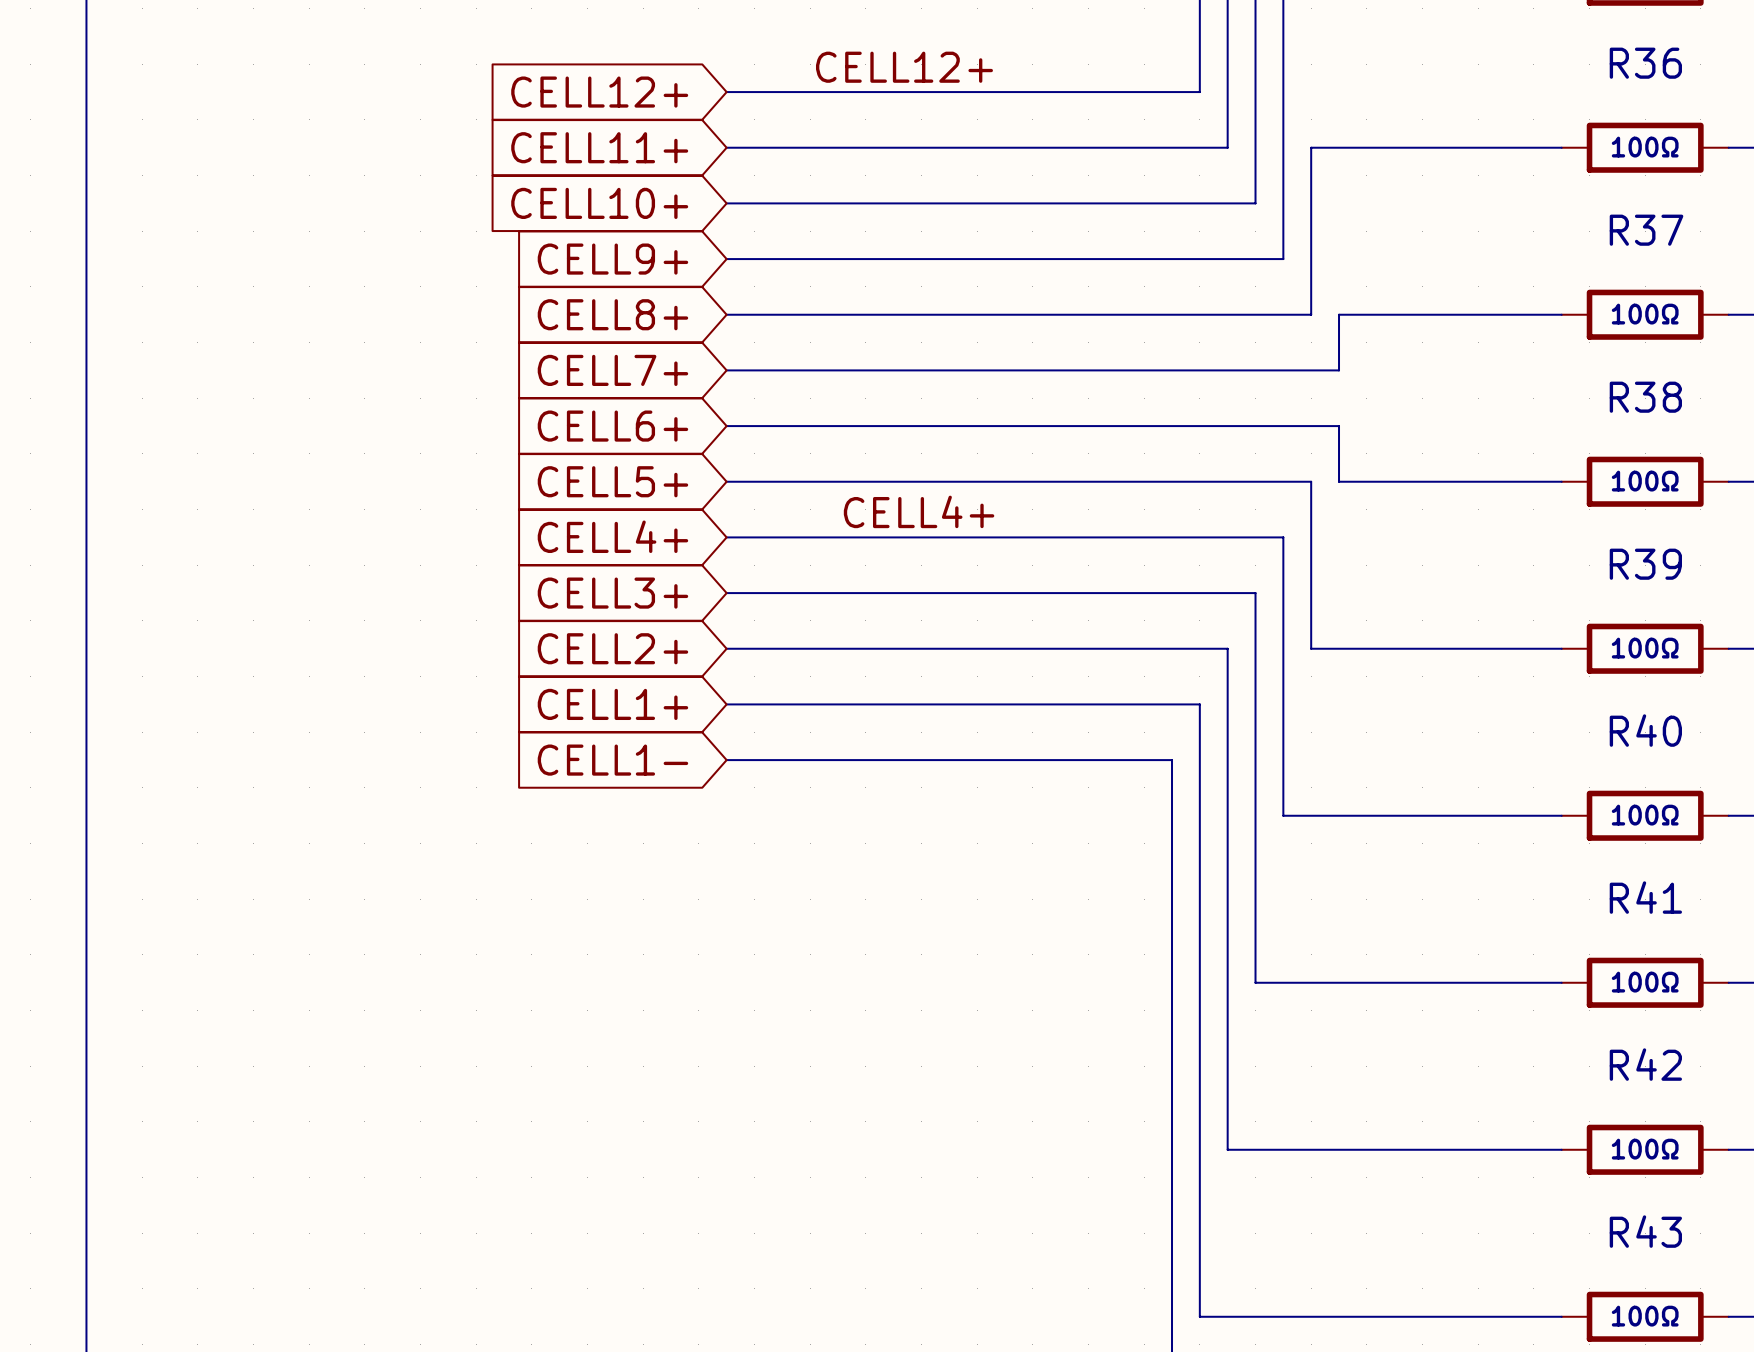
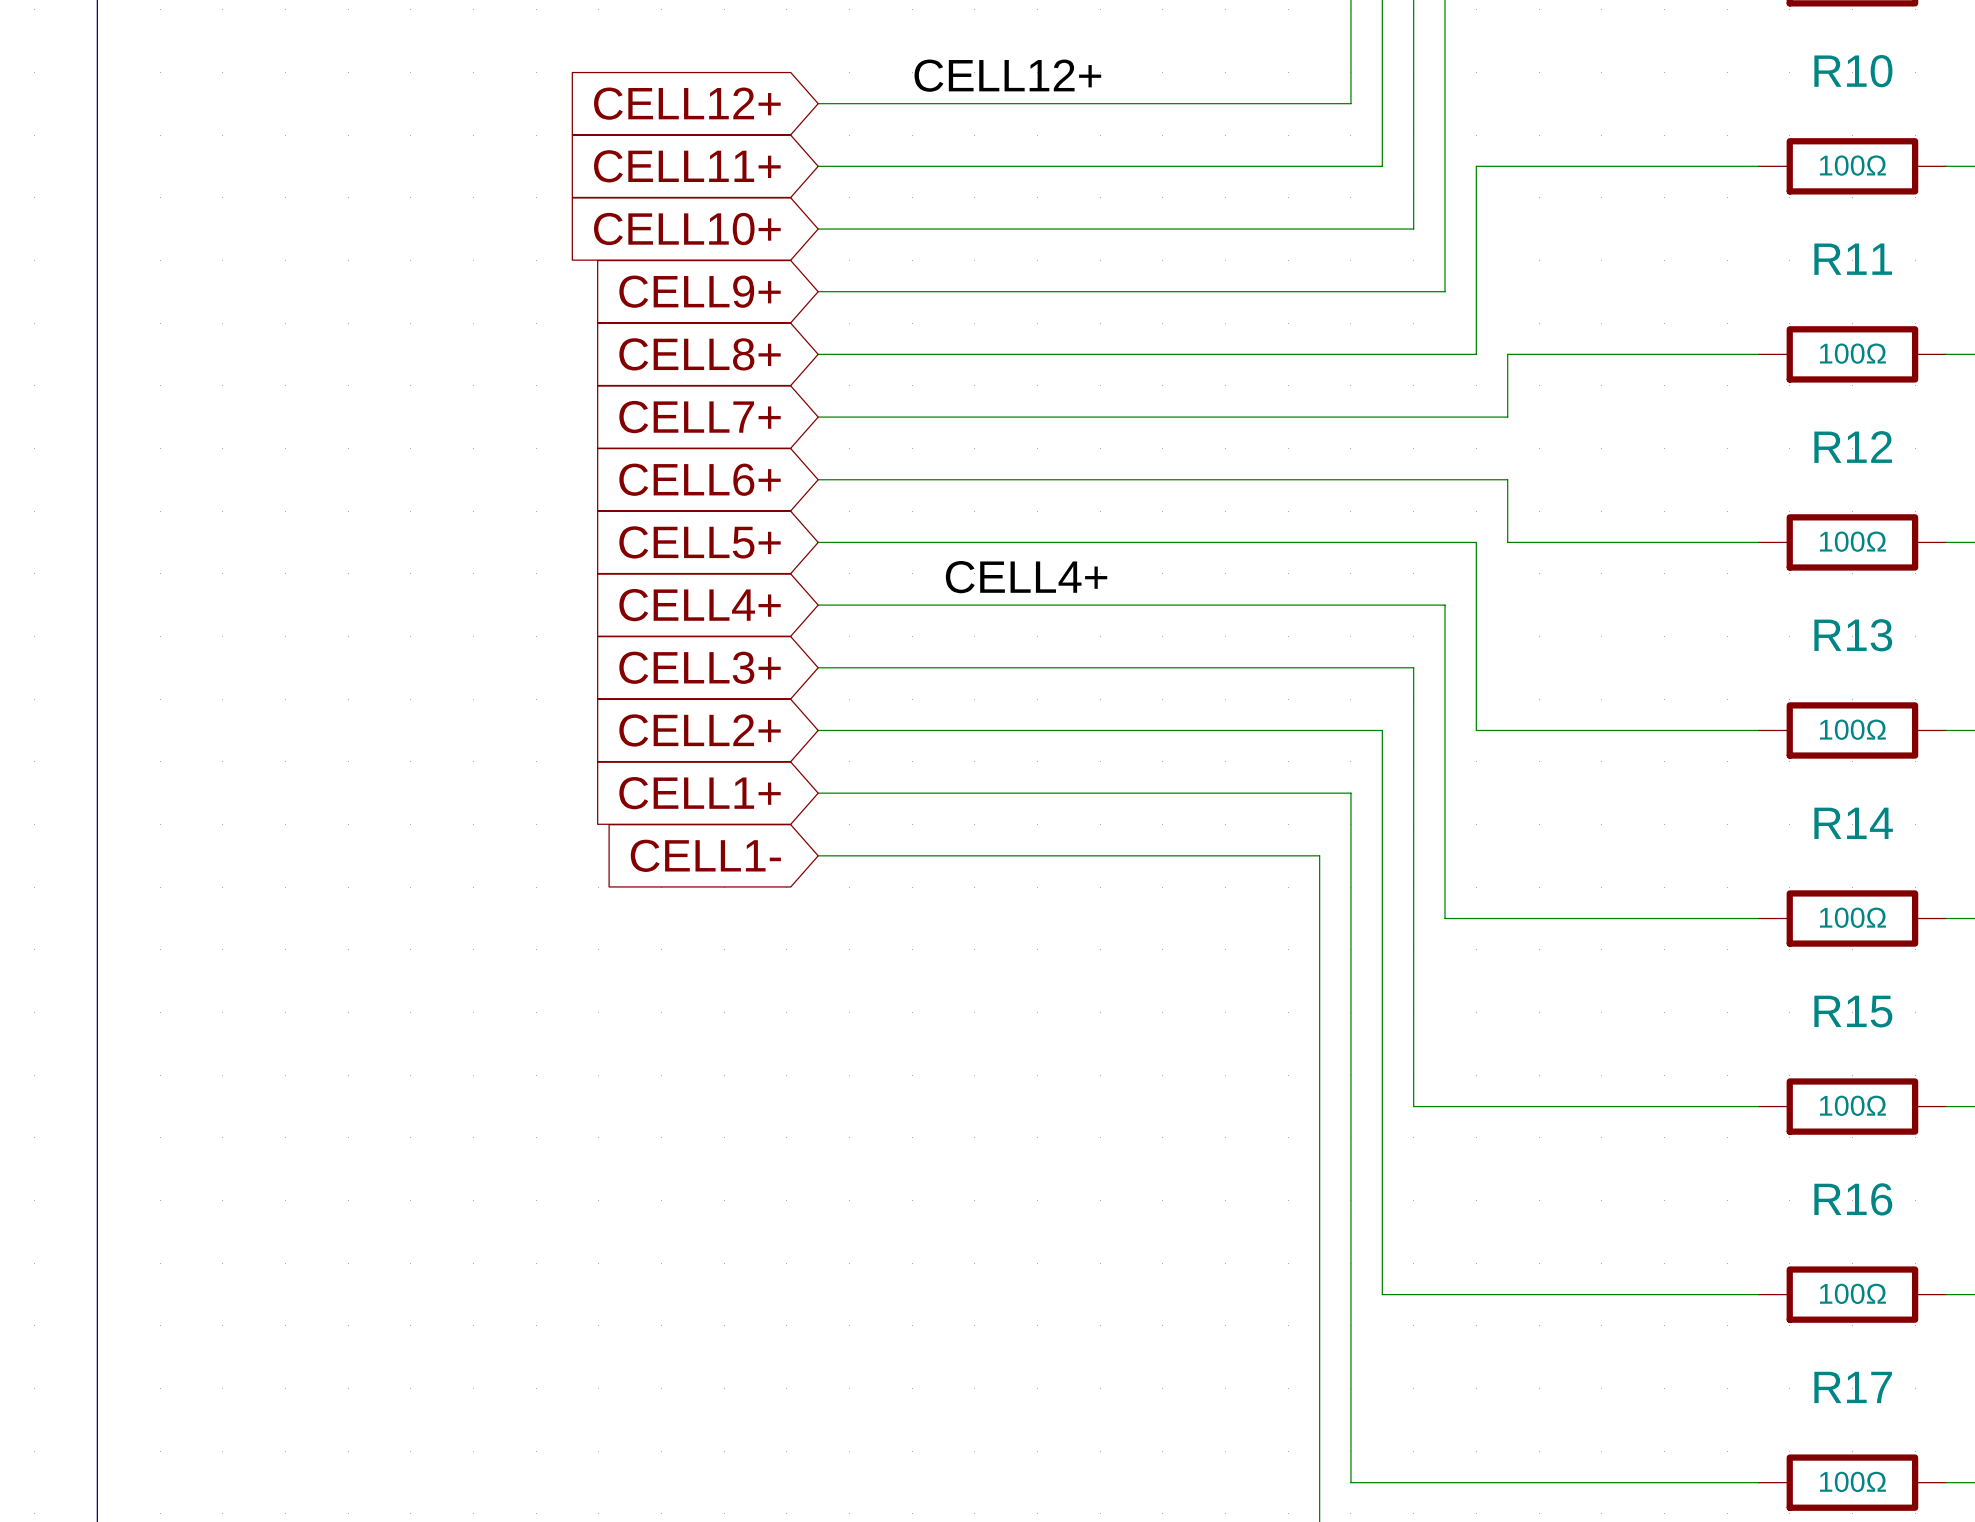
R36 name: R36 (1645, 63) -> R10 (1853, 71)
R37 name: R37 (1646, 230) -> R11 (1853, 259)
R38 name: R38 (1645, 397) -> R12 (1853, 447)
R39 name: R39 (1645, 564) -> R13 (1853, 635)
R40 name: R40 (1645, 730) -> R14 (1853, 823)
R41 name: R41 (1645, 897) -> R15 (1853, 1011)
R42 name: R42 (1645, 1064) -> R16 (1853, 1199)
R43 name: R43 (1645, 1231) -> R17 (1853, 1387)

